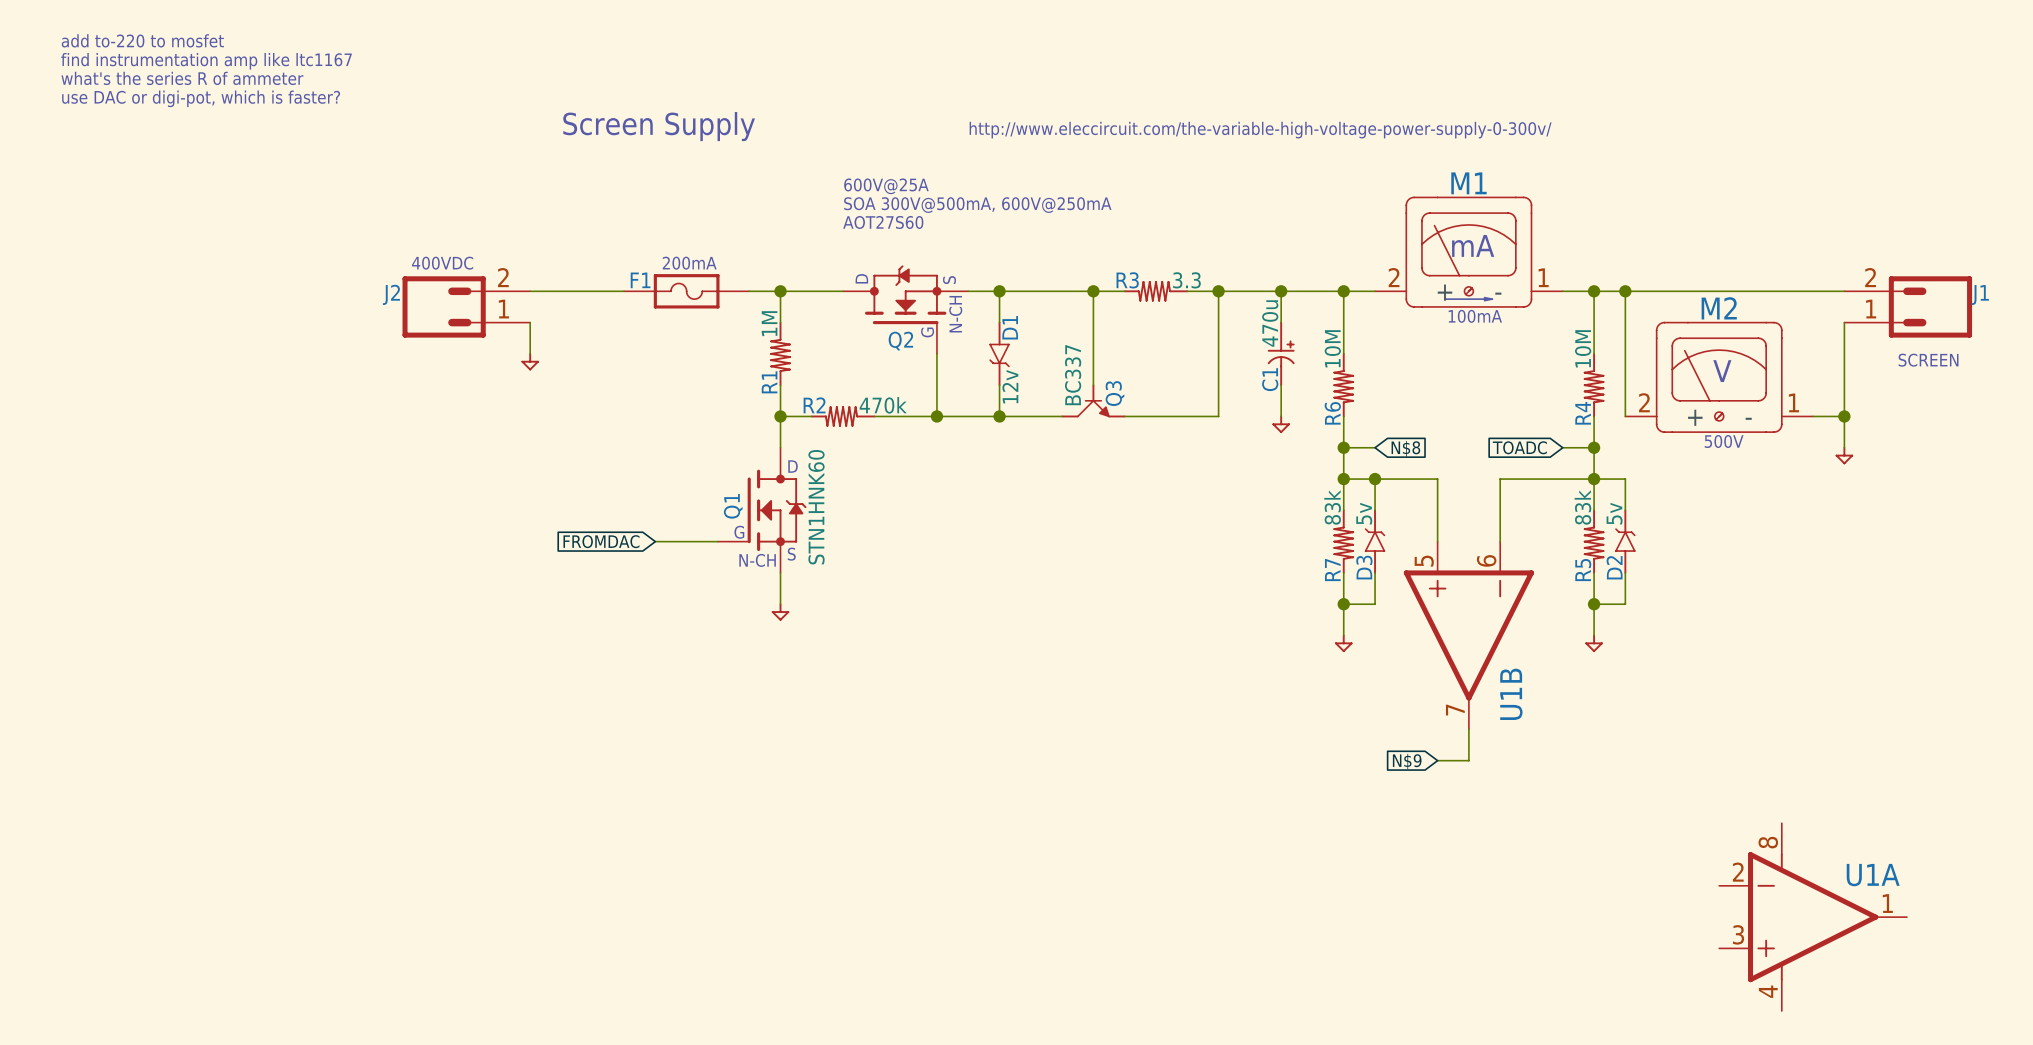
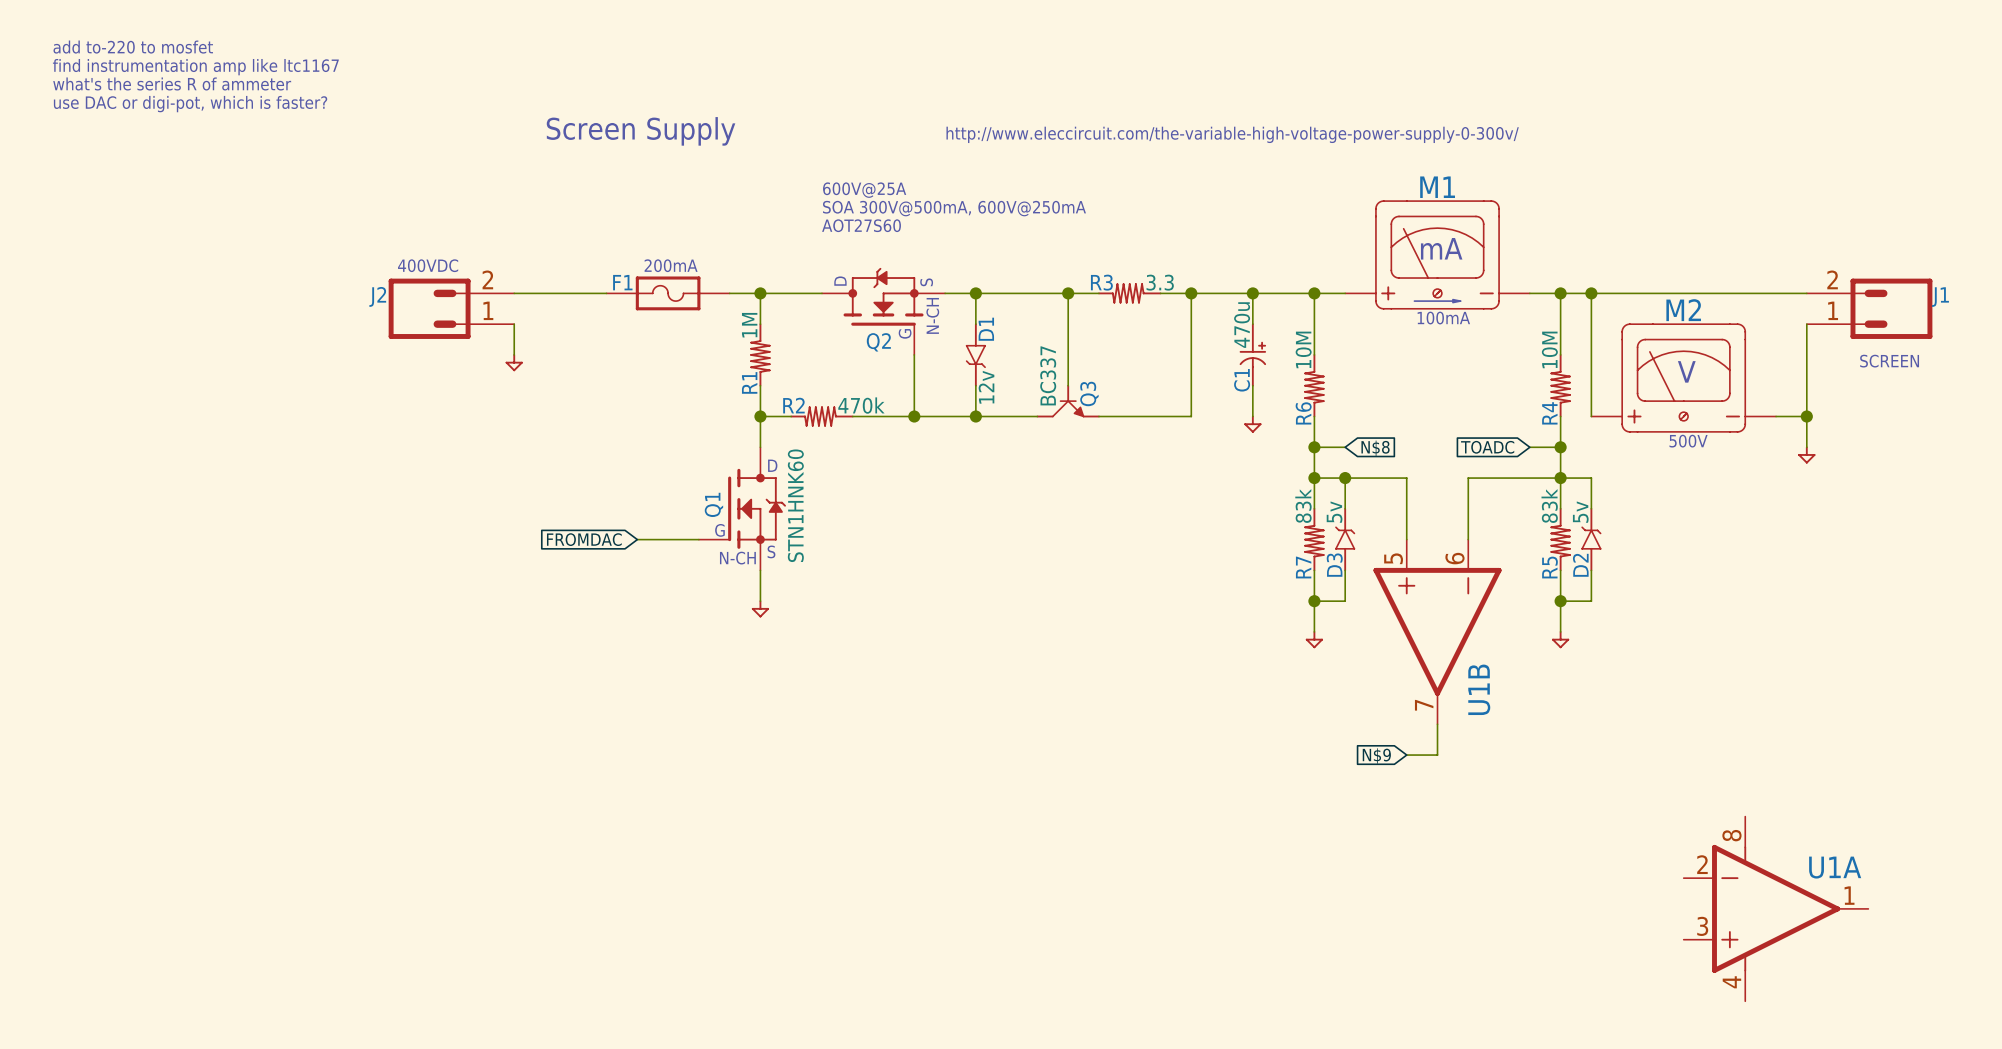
M1 symbol: [1375, 196, 1563, 308] -> [1345, 200, 1530, 310]
M2 symbol: [1625, 321, 1814, 433] -> [1591, 323, 1777, 433]

